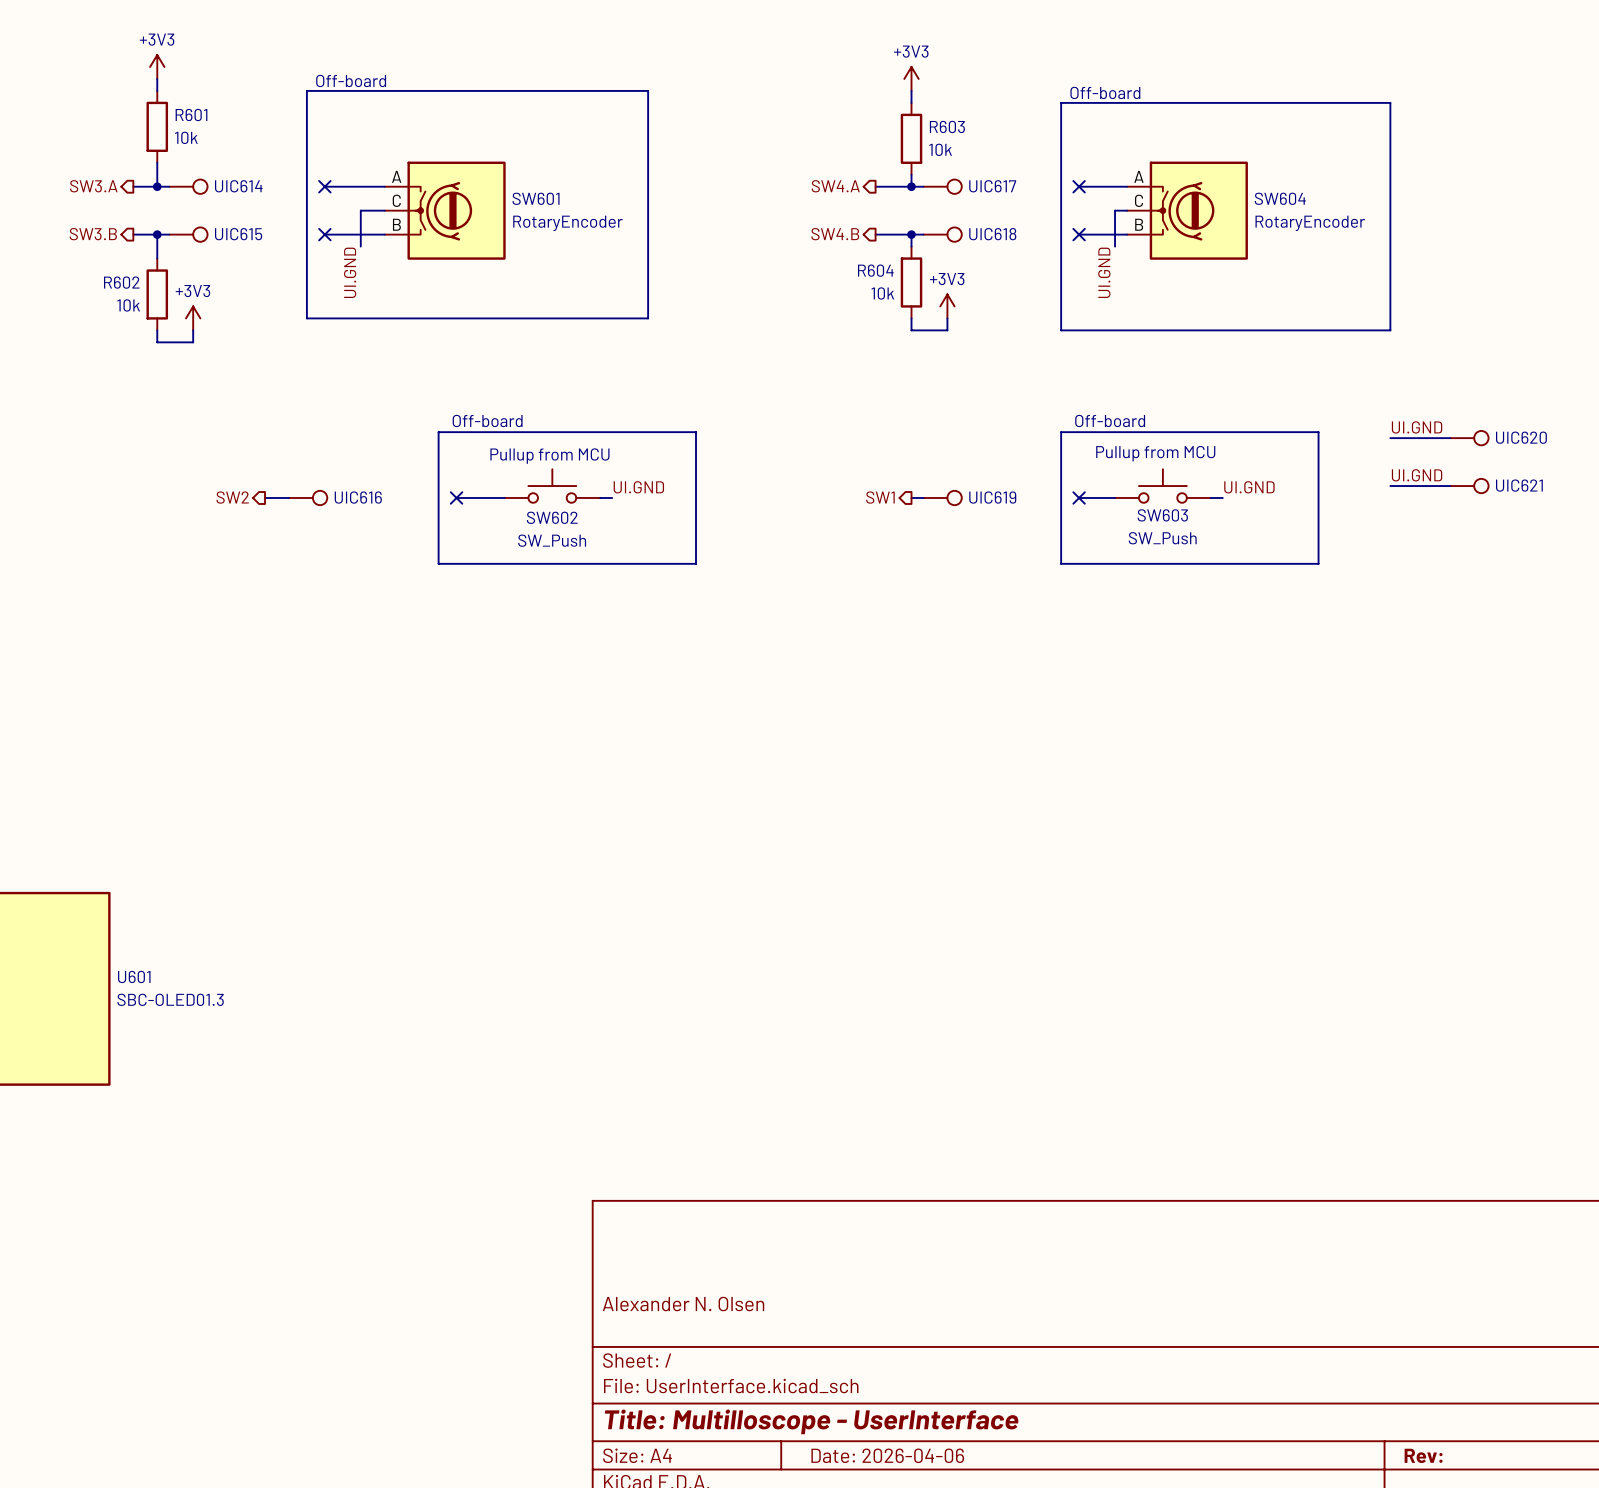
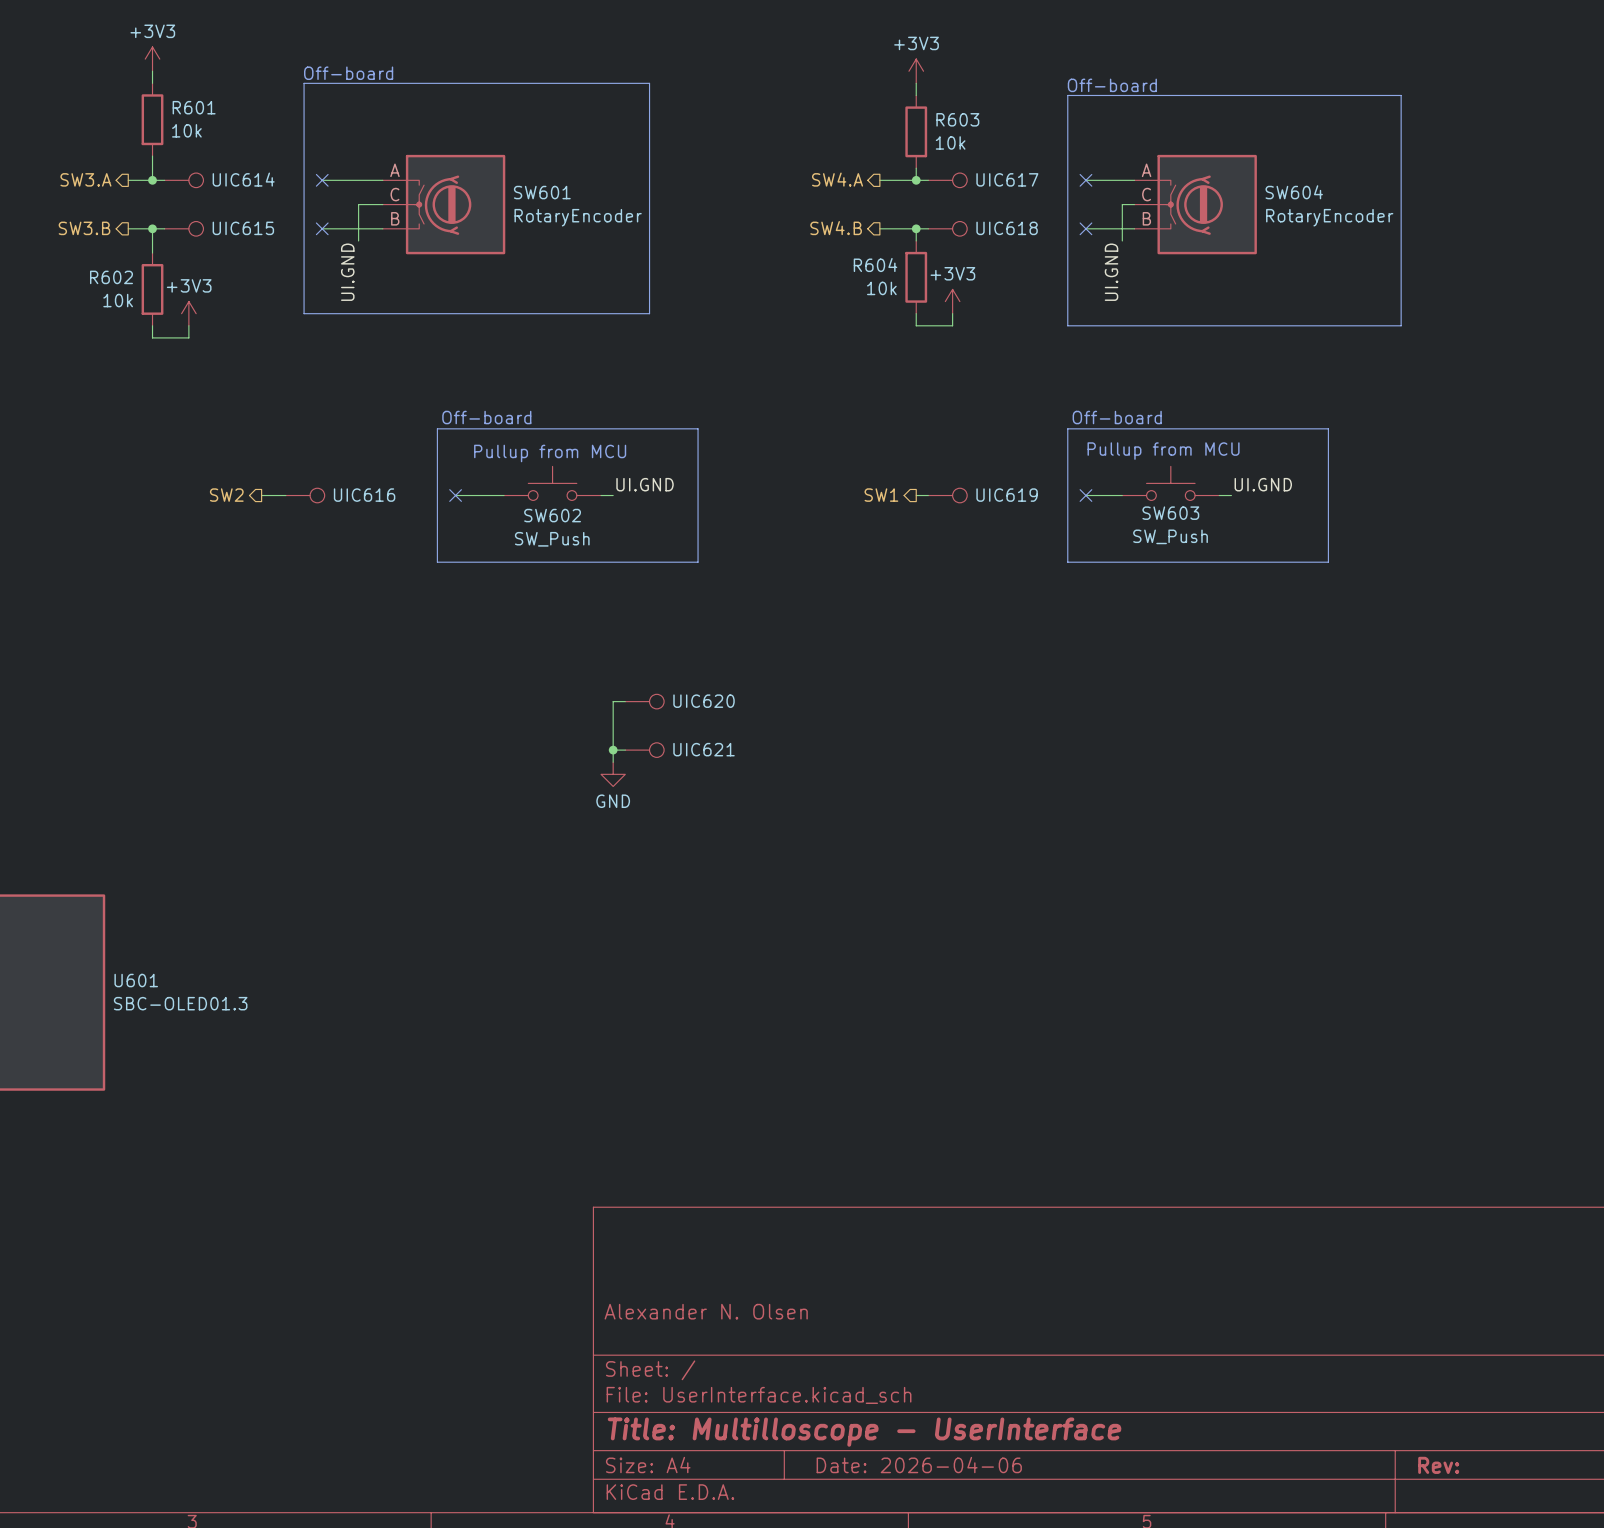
label: UI.GND (1417, 427) -> none
wire: (1390, 438) (1450, 438) -> none
UIC620 position: (1469, 438) -> (644, 701)
label: UI.GND (1417, 475) -> none
wire: (1390, 486) (1450, 486) -> none
UIC621 position: (1469, 486) -> (644, 750)
wire: none -> (625, 701) (613, 701) (613, 762)
wire: none -> (613, 750) (625, 750)
junction: none -> (613, 750)
power symbol: none -> GND (613, 774)

